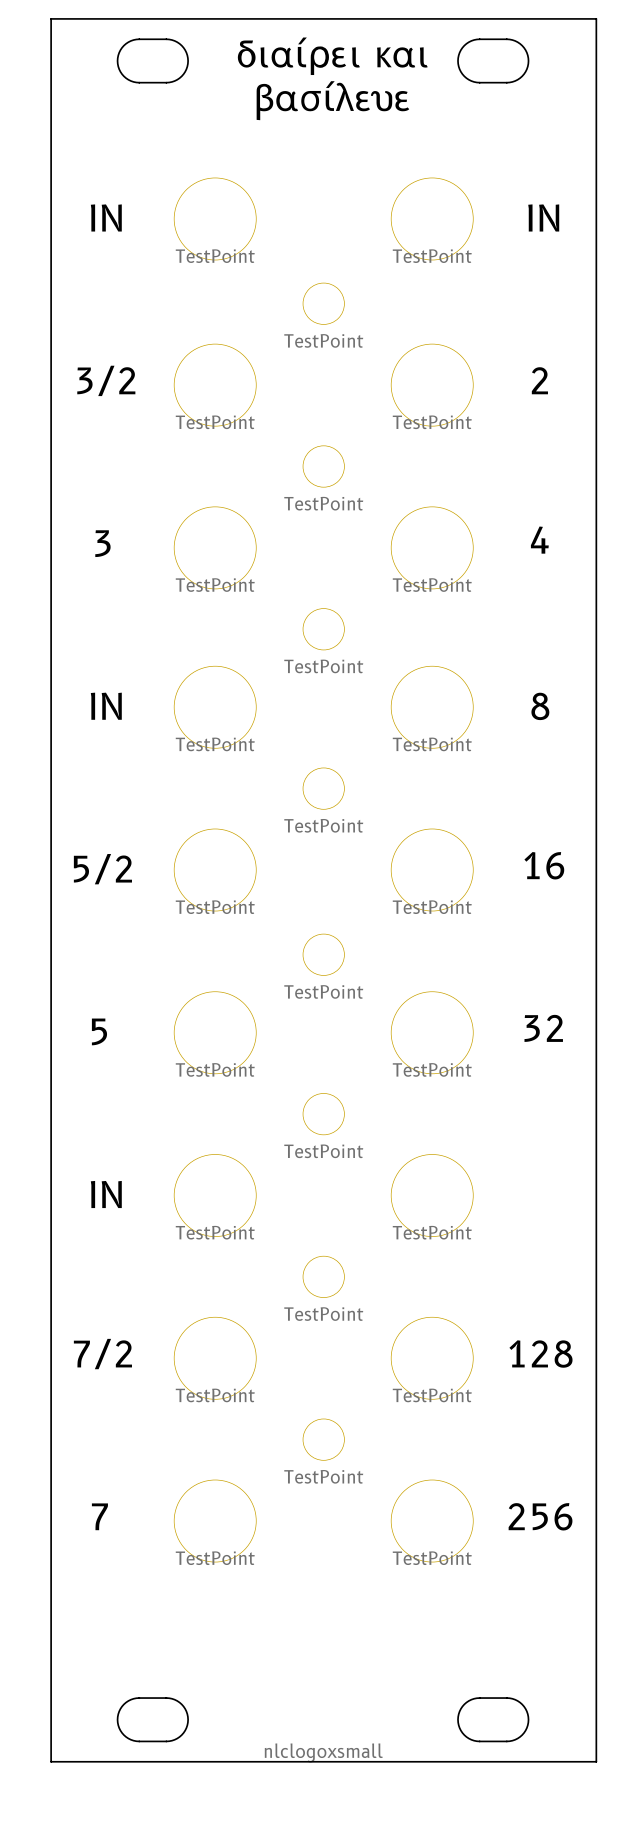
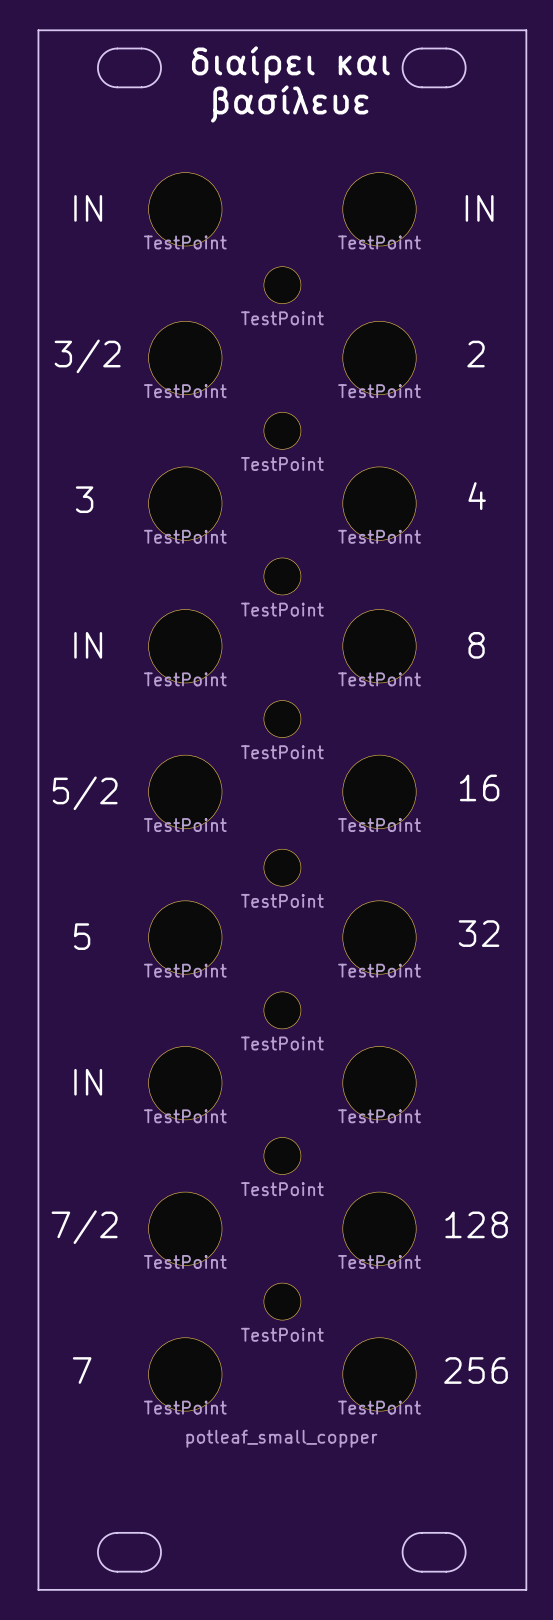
drawing: none -> [186, 1429, 378, 1448]
drawing: [264, 1743, 383, 1763] -> none

